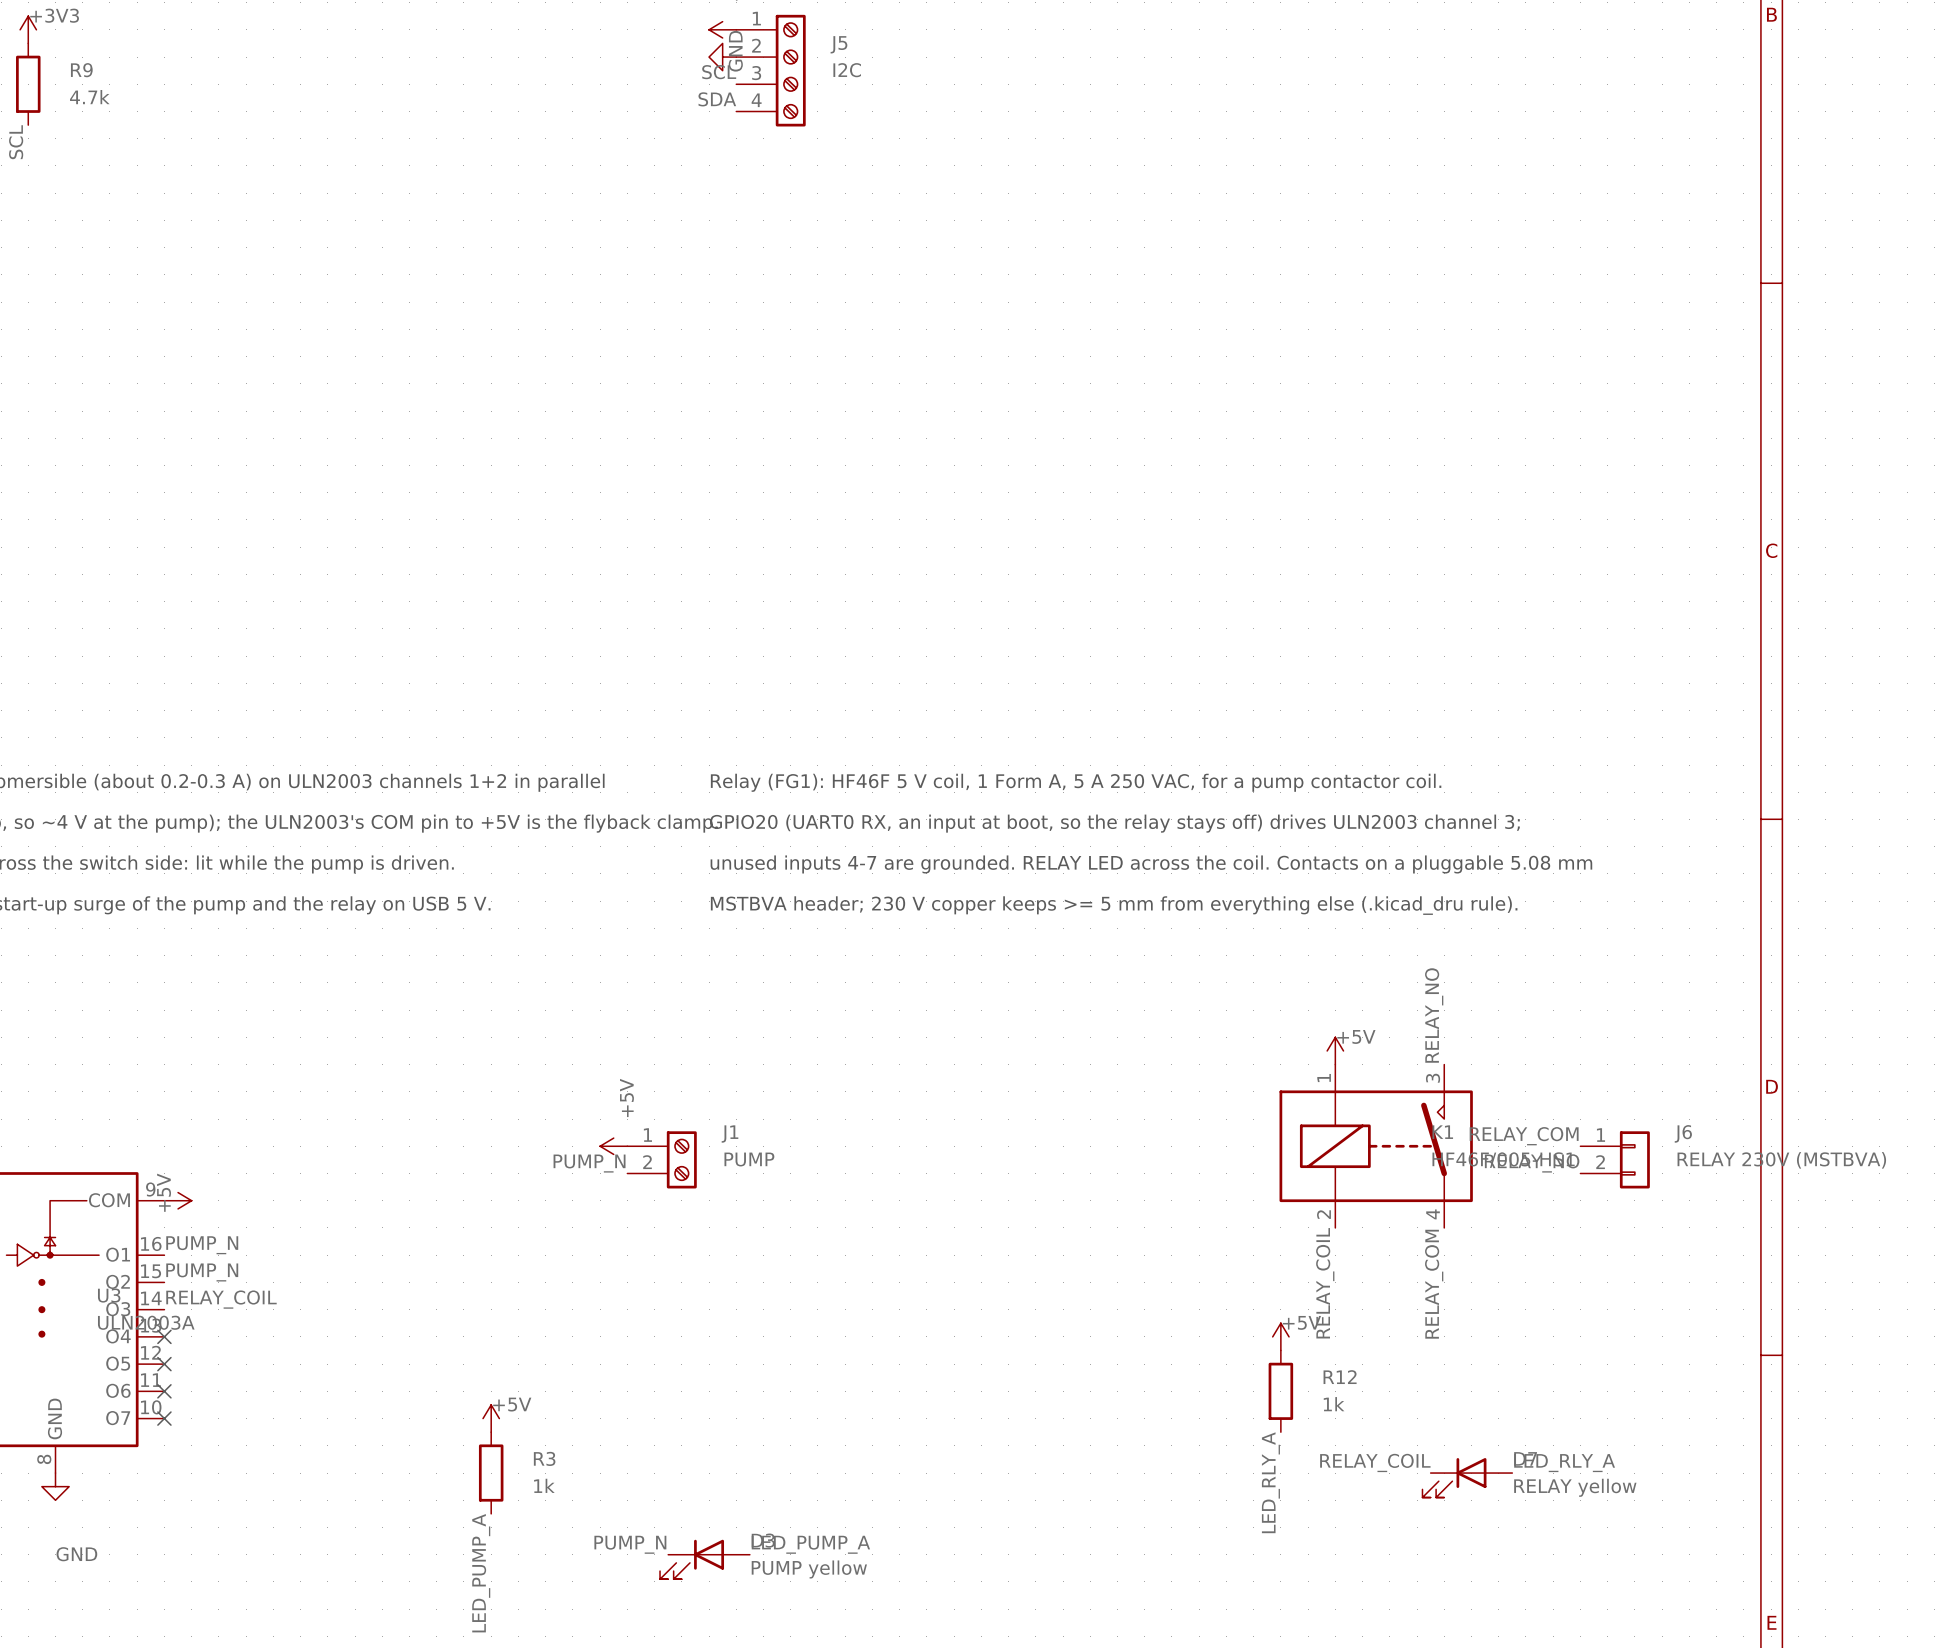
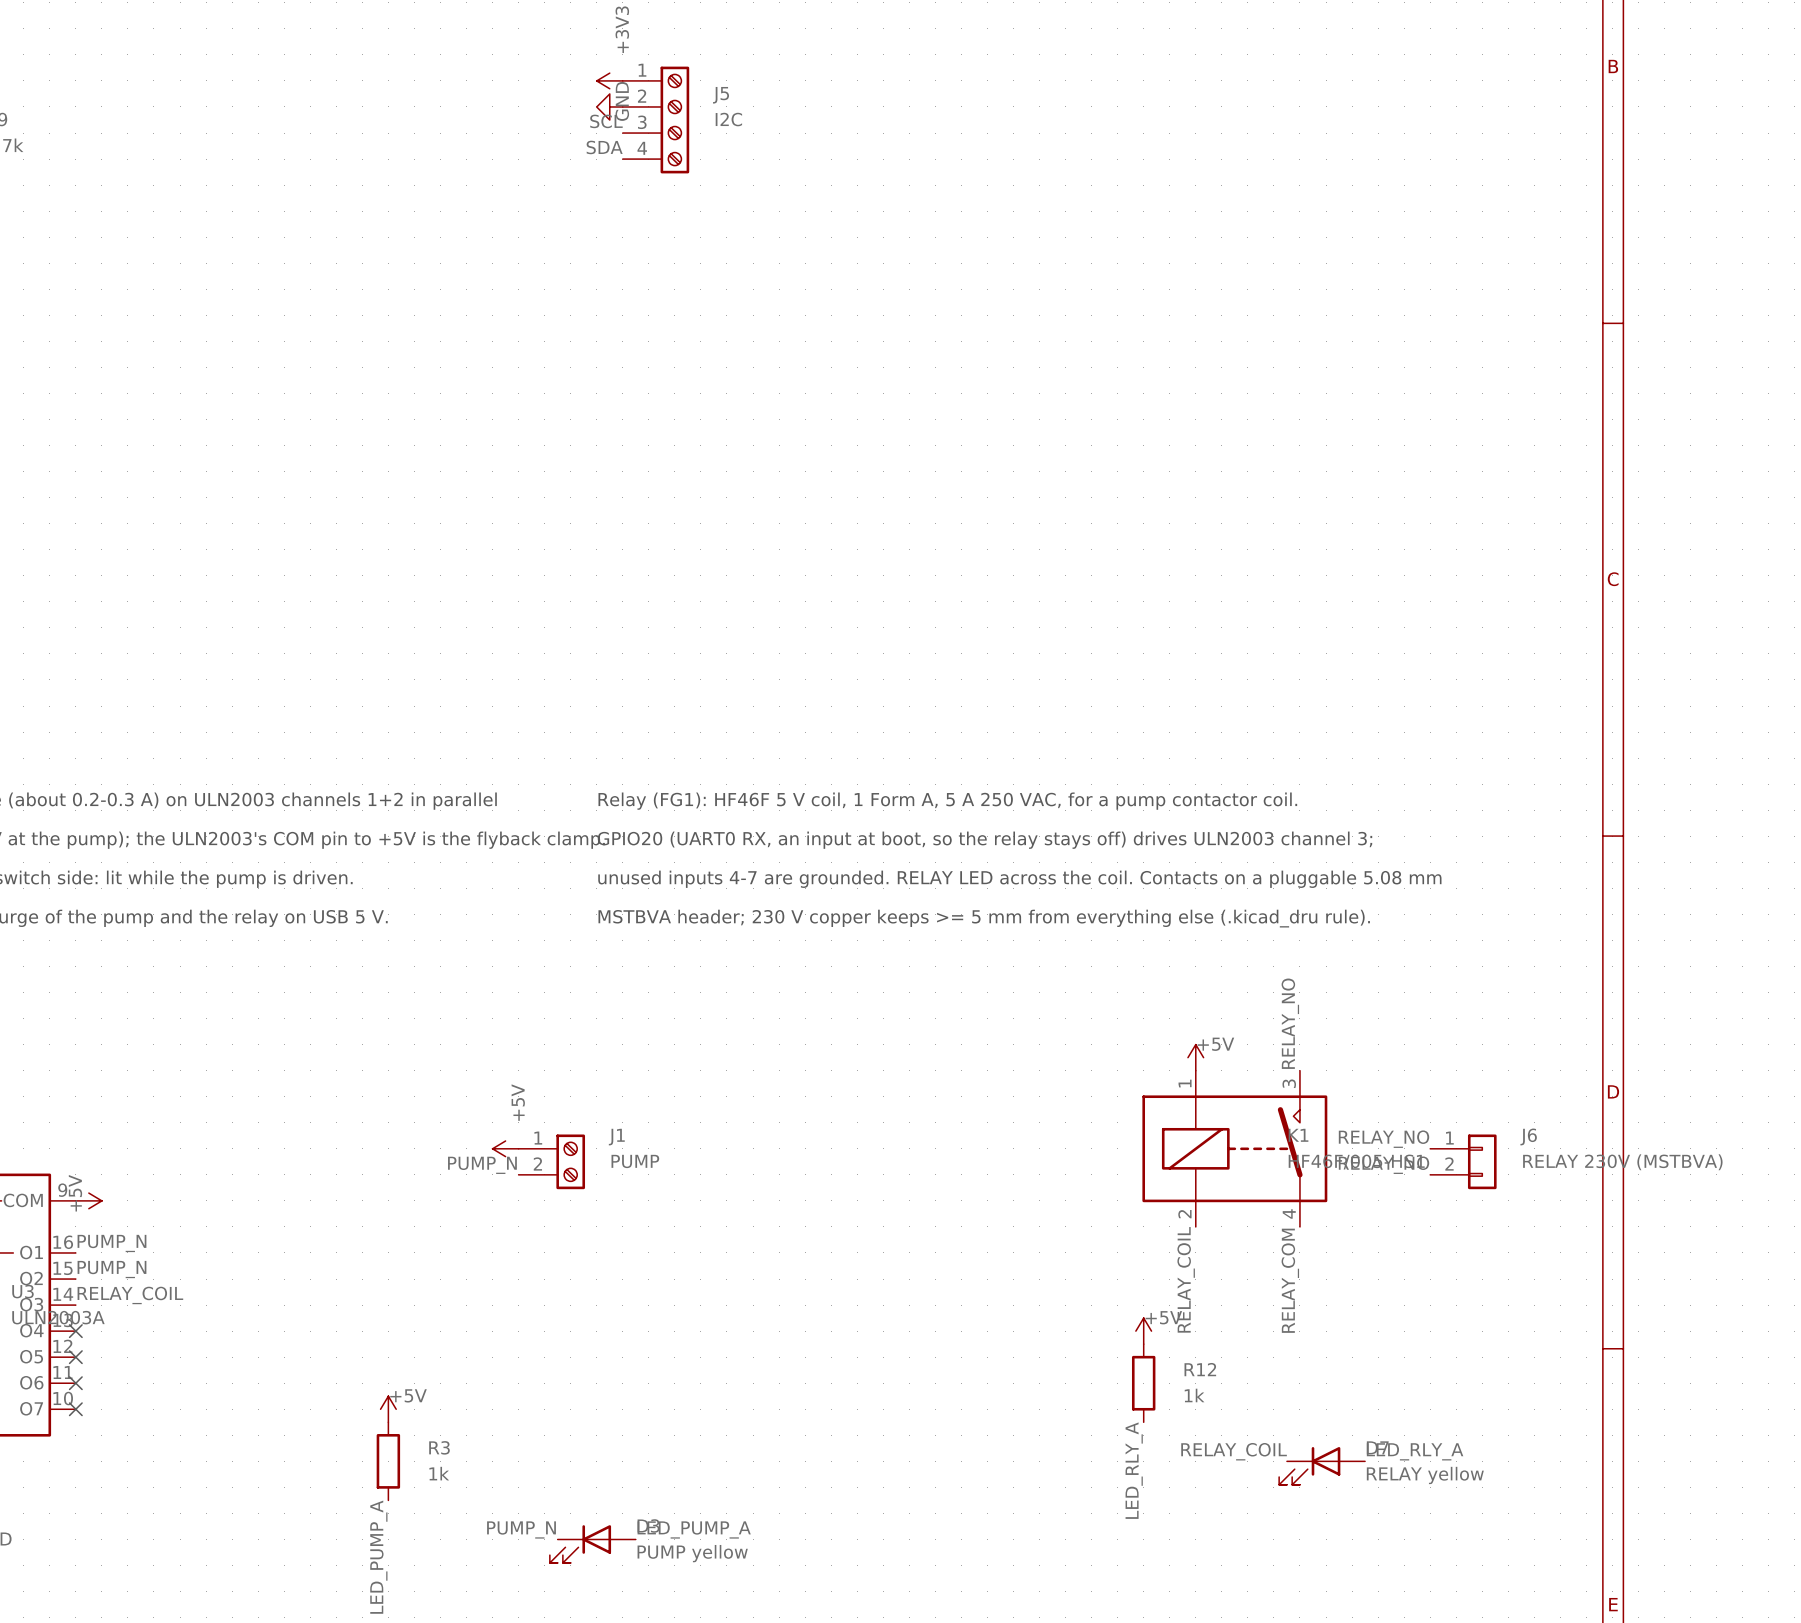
label: RELAY_COM (1524, 1136) -> RELAY_NO (1384, 1139)

